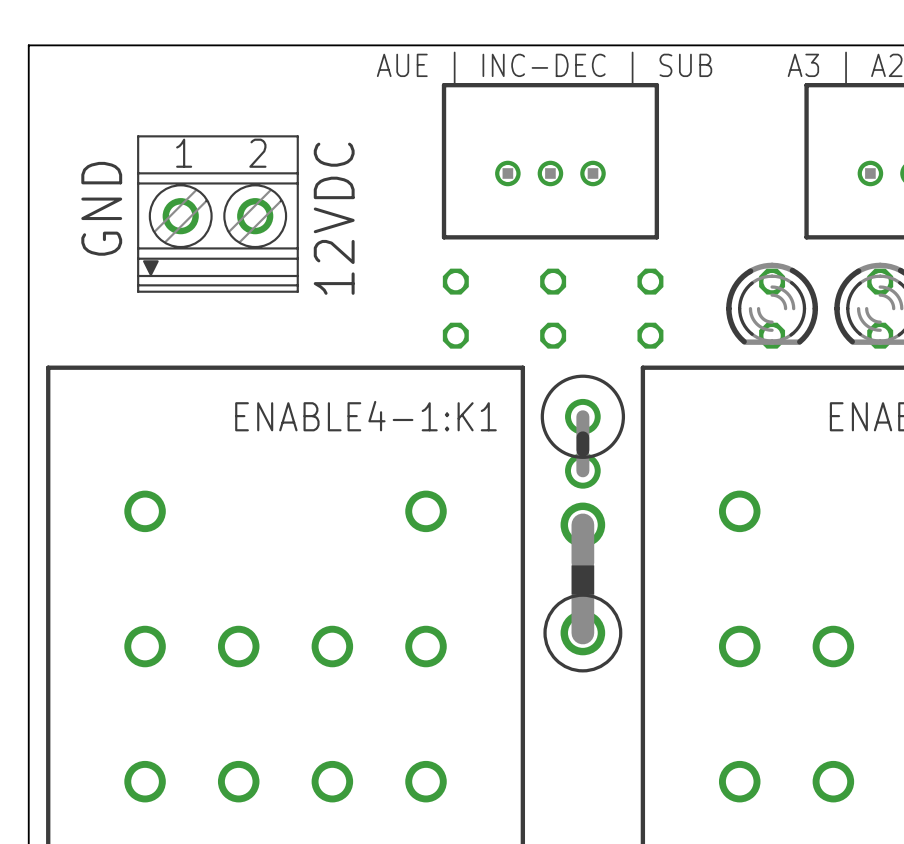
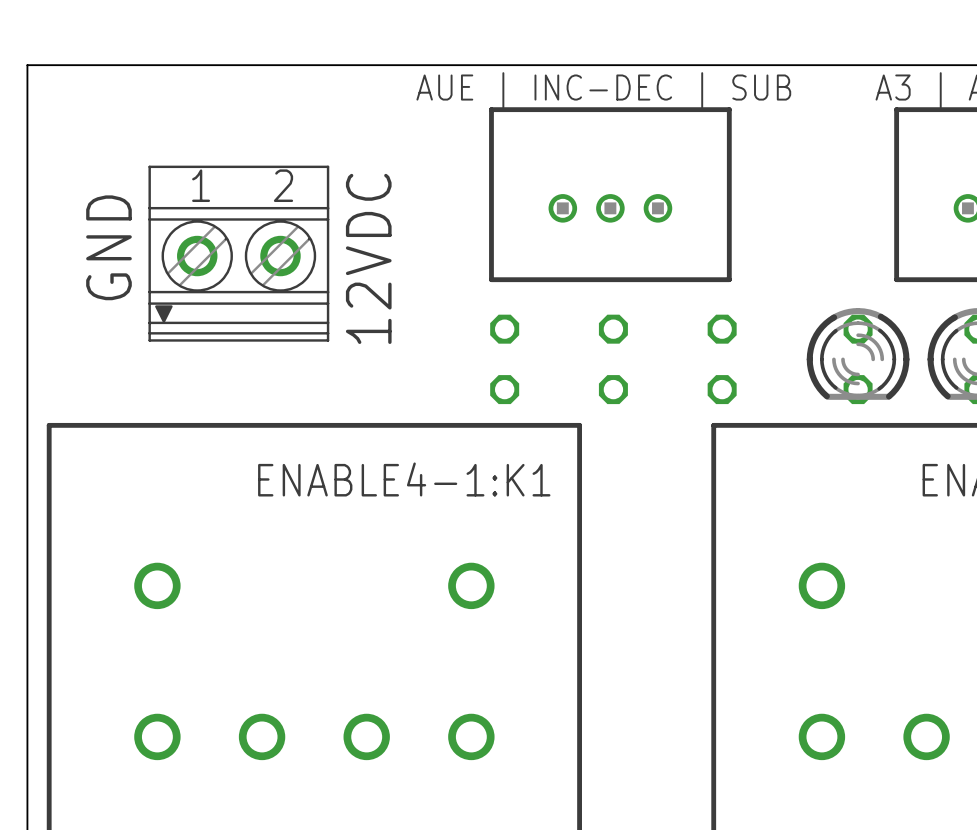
part: (582, 431) -> none
part: (582, 587) -> none

